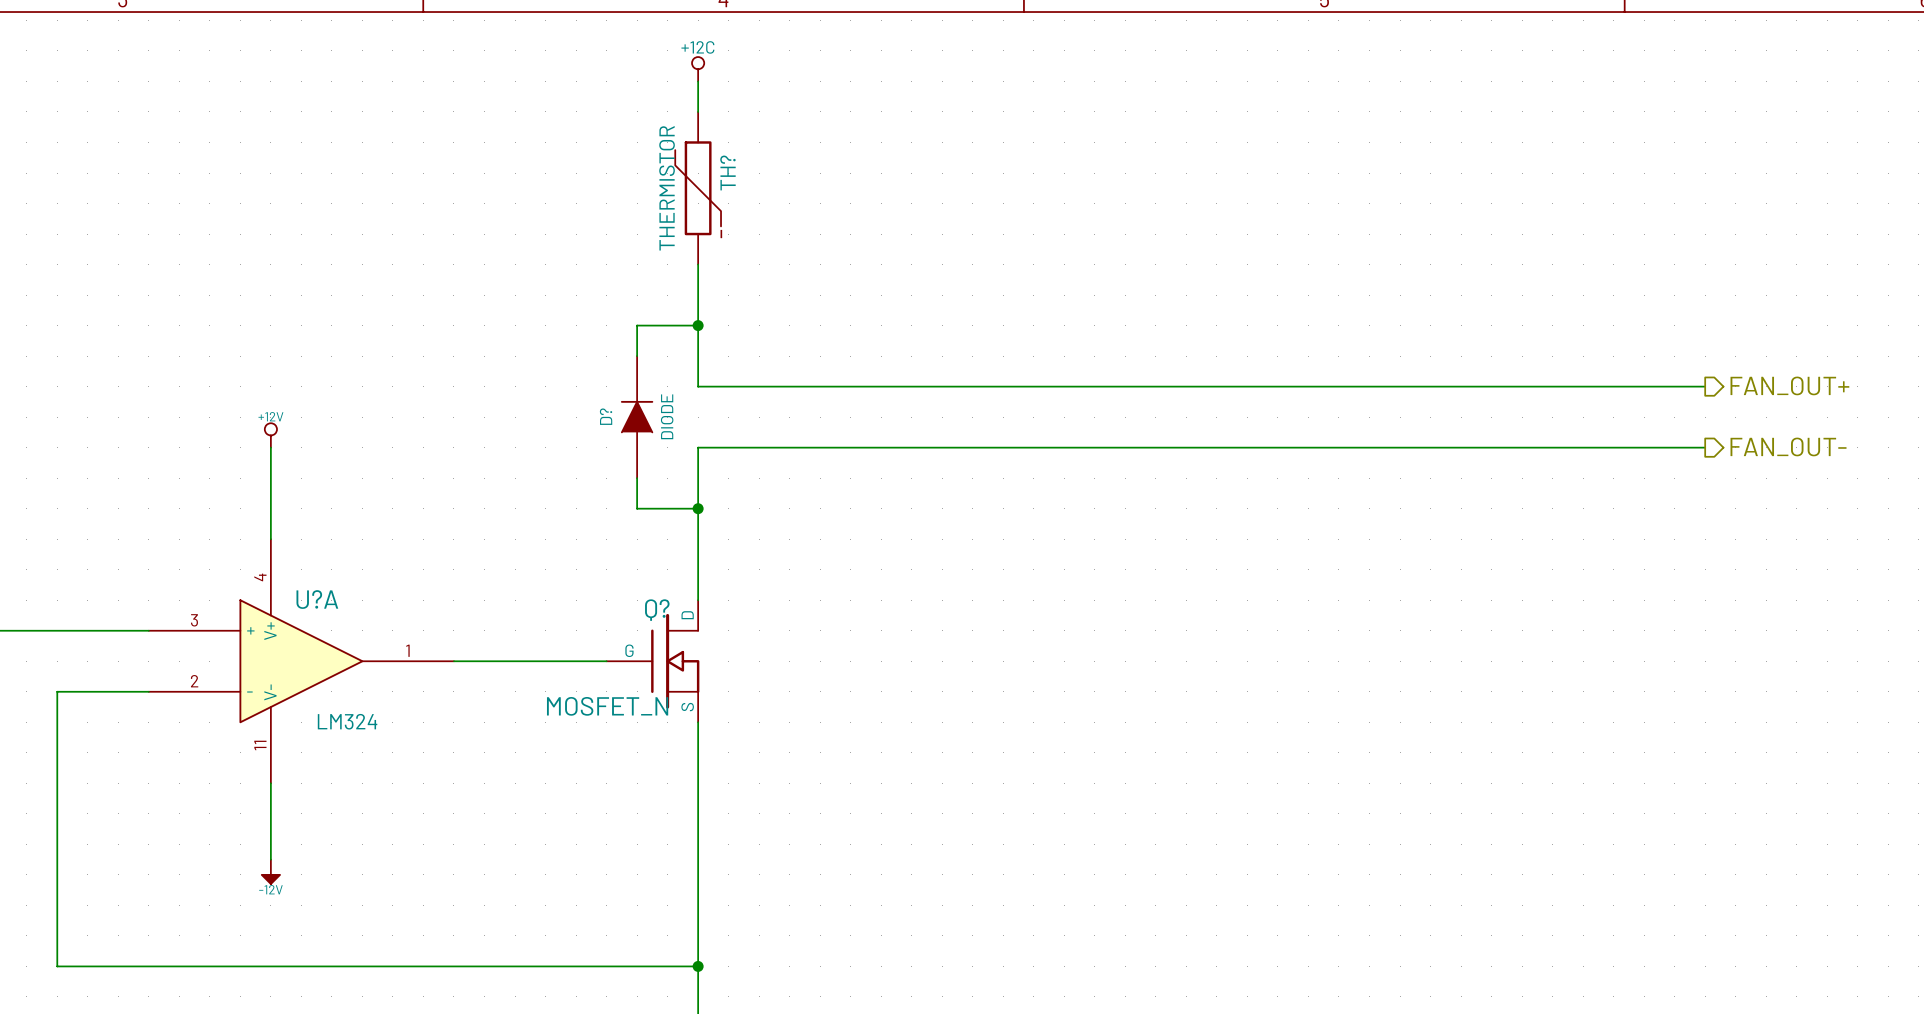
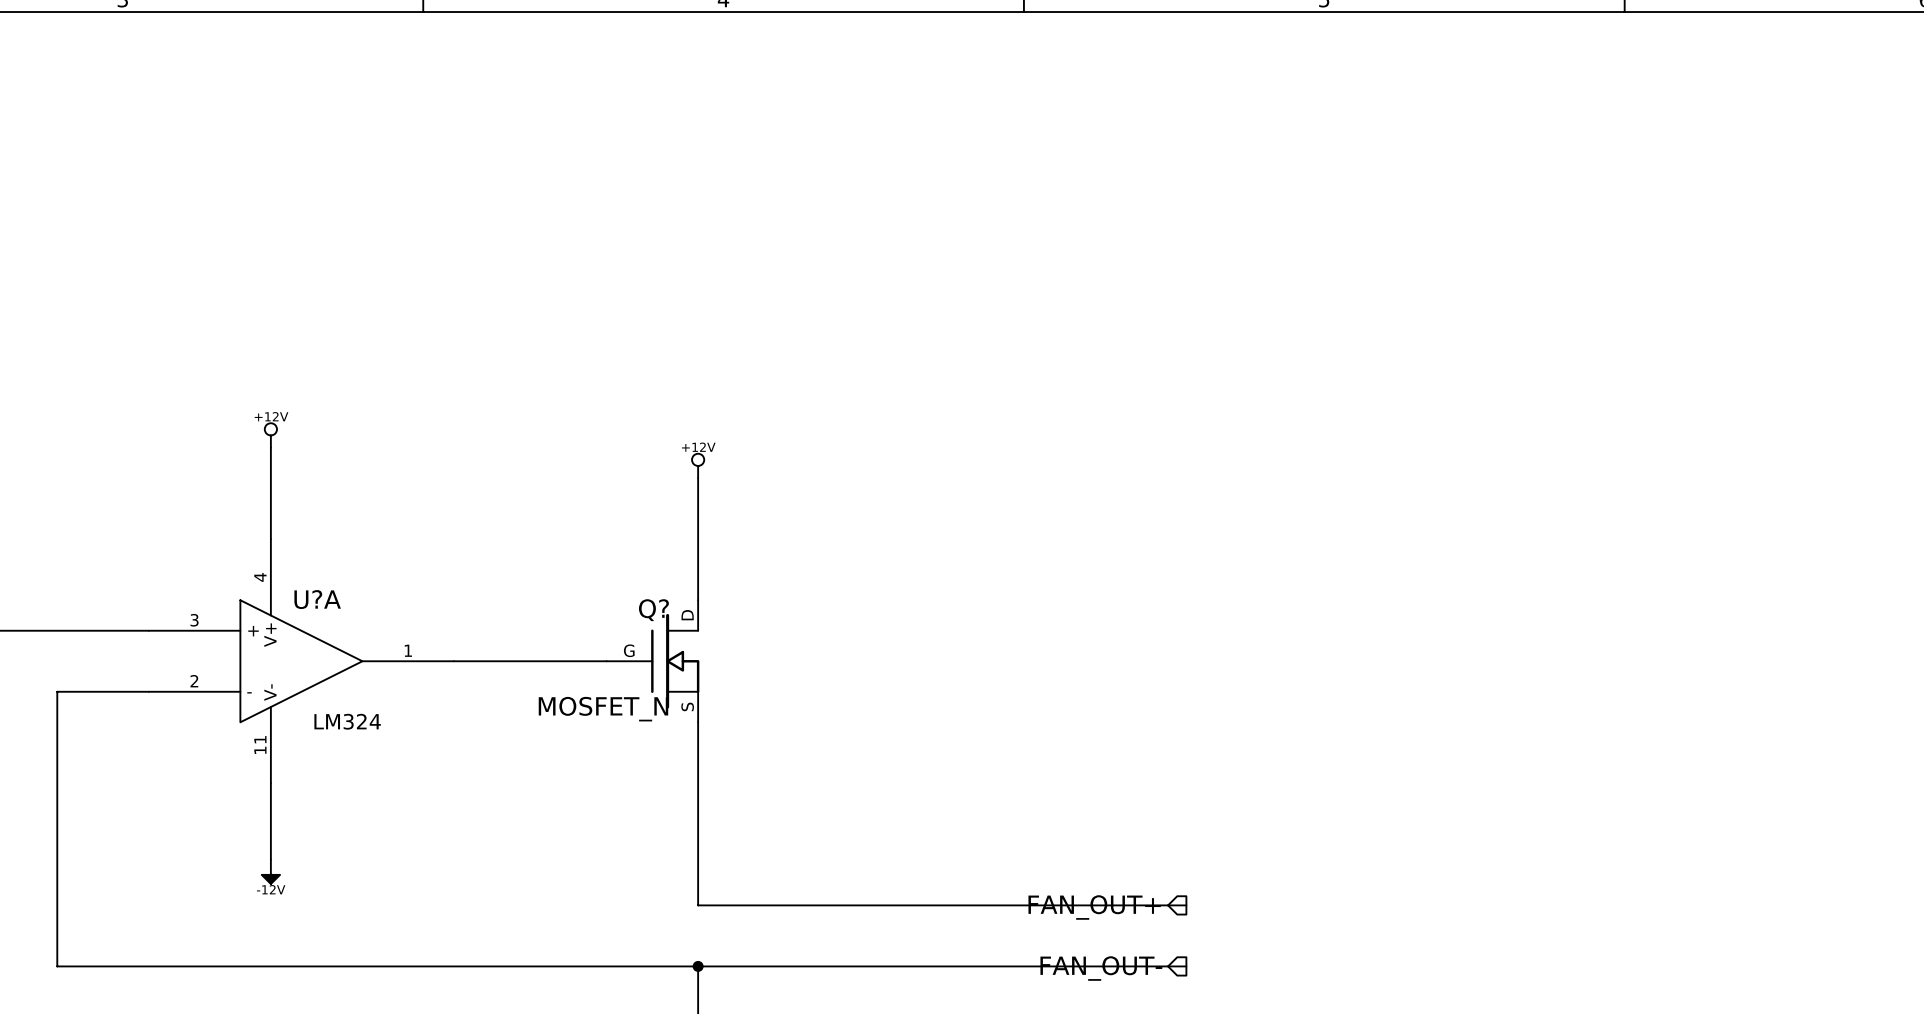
power symbol: +12C (698, 69) -> none
wire: (698, 81) (698, 111) -> none
TH?: THERMISTOR (698, 188) -> none
wire: (698, 264) (698, 386) (1705, 386) -> none
wire: (698, 325) (637, 325) (637, 356) -> none
junction: (698, 325) -> none
hierarchical label: FAN_OUT+ (1789, 385) -> none
D?: DIODE (637, 417) -> none
hierarchical label: FAN_OUT- (1788, 446) -> none
wire: (1705, 447) (698, 447) (698, 478) -> none
power symbol: none -> +12V (698, 465)
wire: (637, 478) (637, 508) (698, 508) -> none
junction: (698, 508) -> none
hierarchical label: none -> FAN_OUT+ (1094, 907)
wire: (698, 905) (698, 966) -> (698, 905) (1186, 905)
hierarchical label: none -> FAN_OUT- (1101, 968)
wire: none -> (698, 966) (1186, 966)

